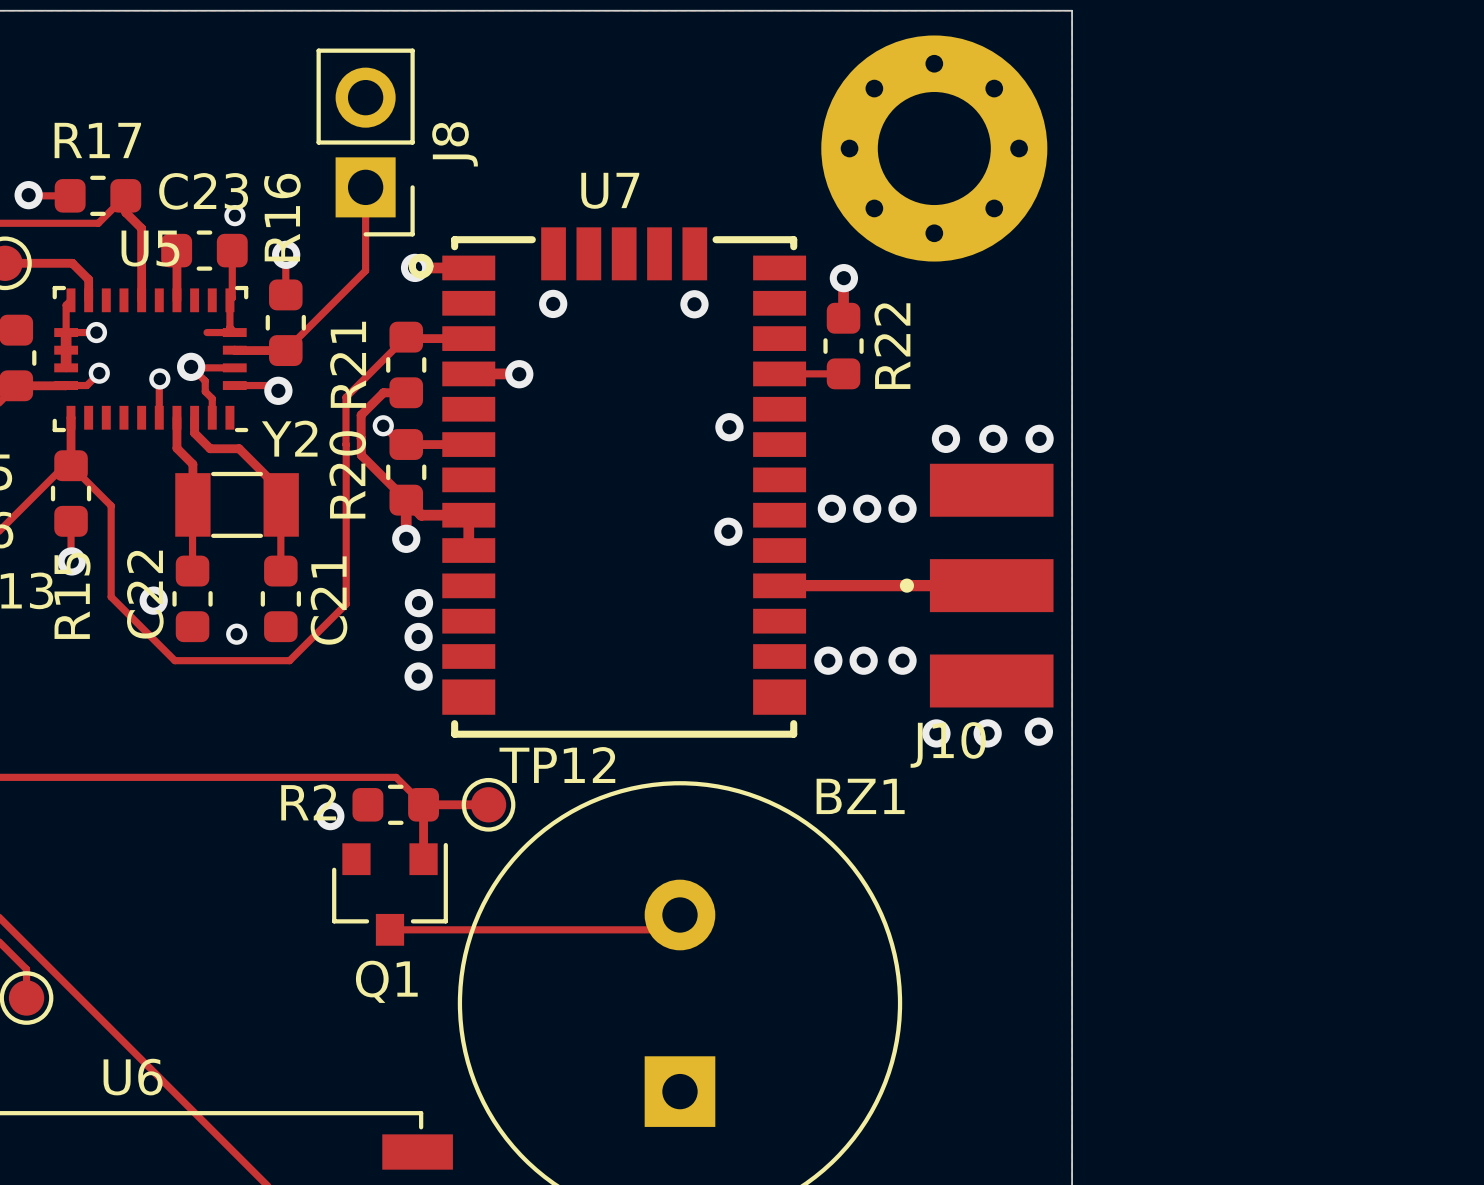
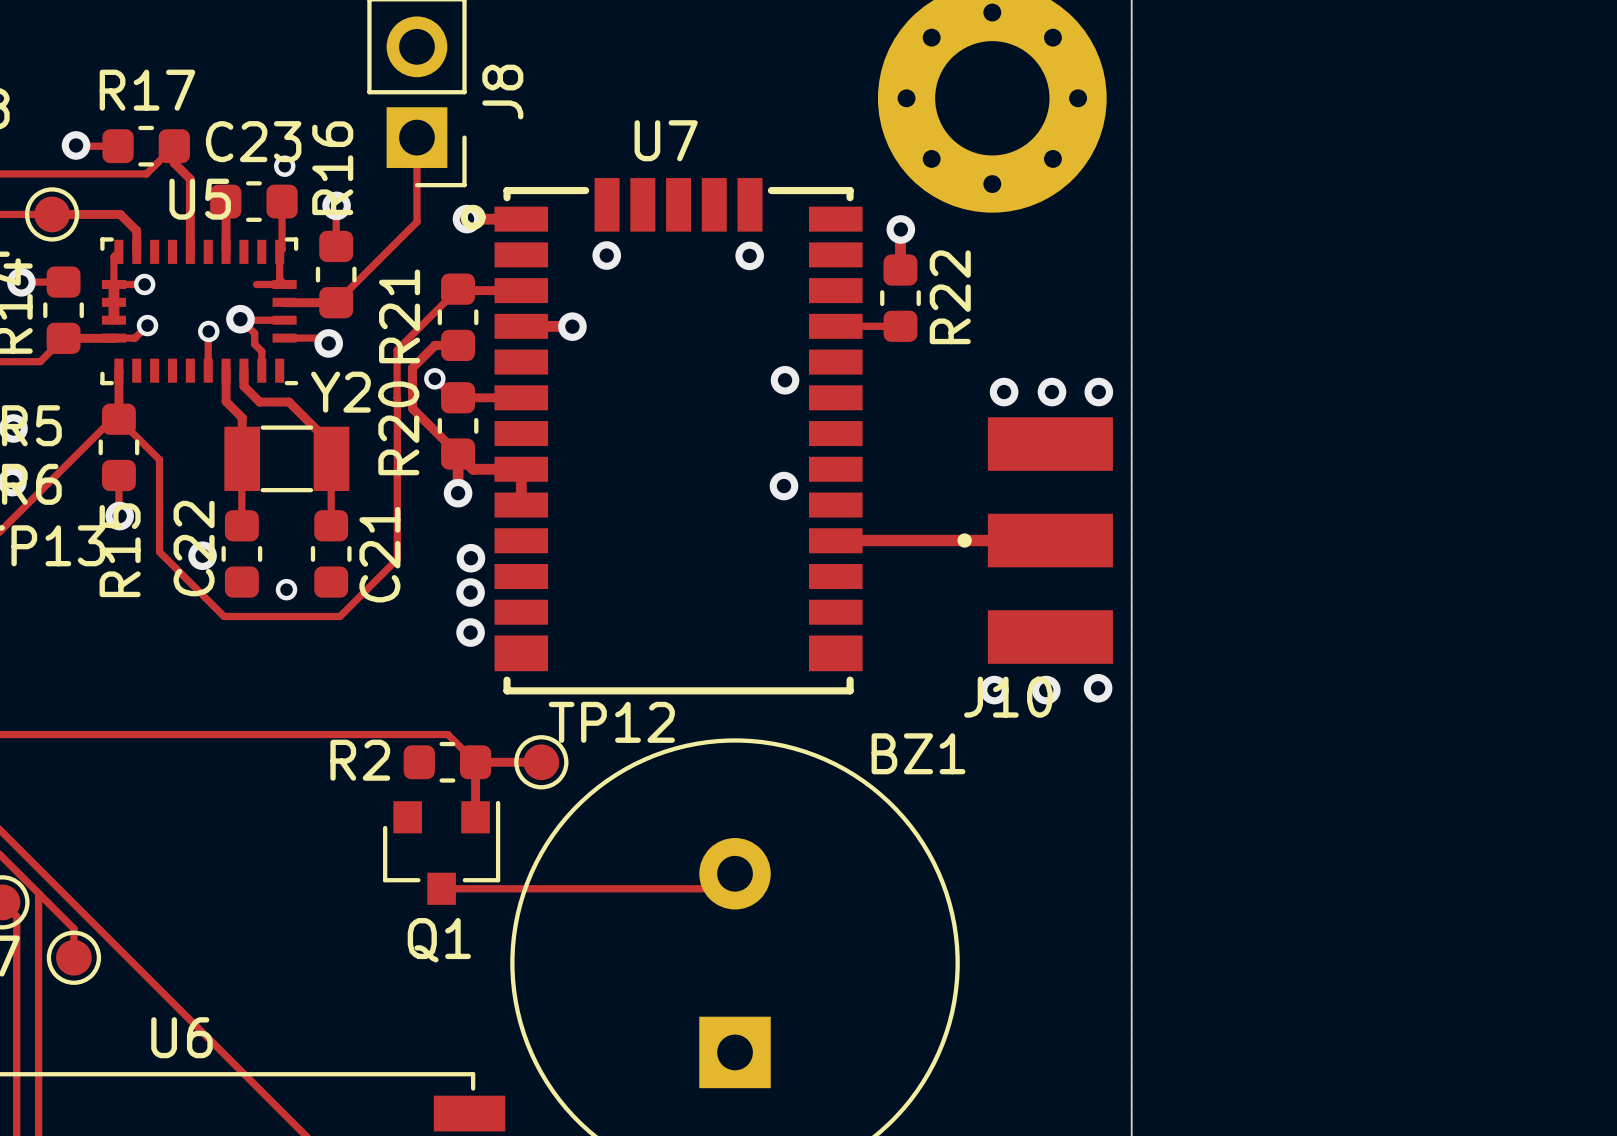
via: (831, 508) -> none
via: (867, 508) -> none
via: (902, 508) -> none
via: (828, 660) -> none
via: (863, 660) -> none
via: (902, 660) -> none
via: (330, 816) -> none

